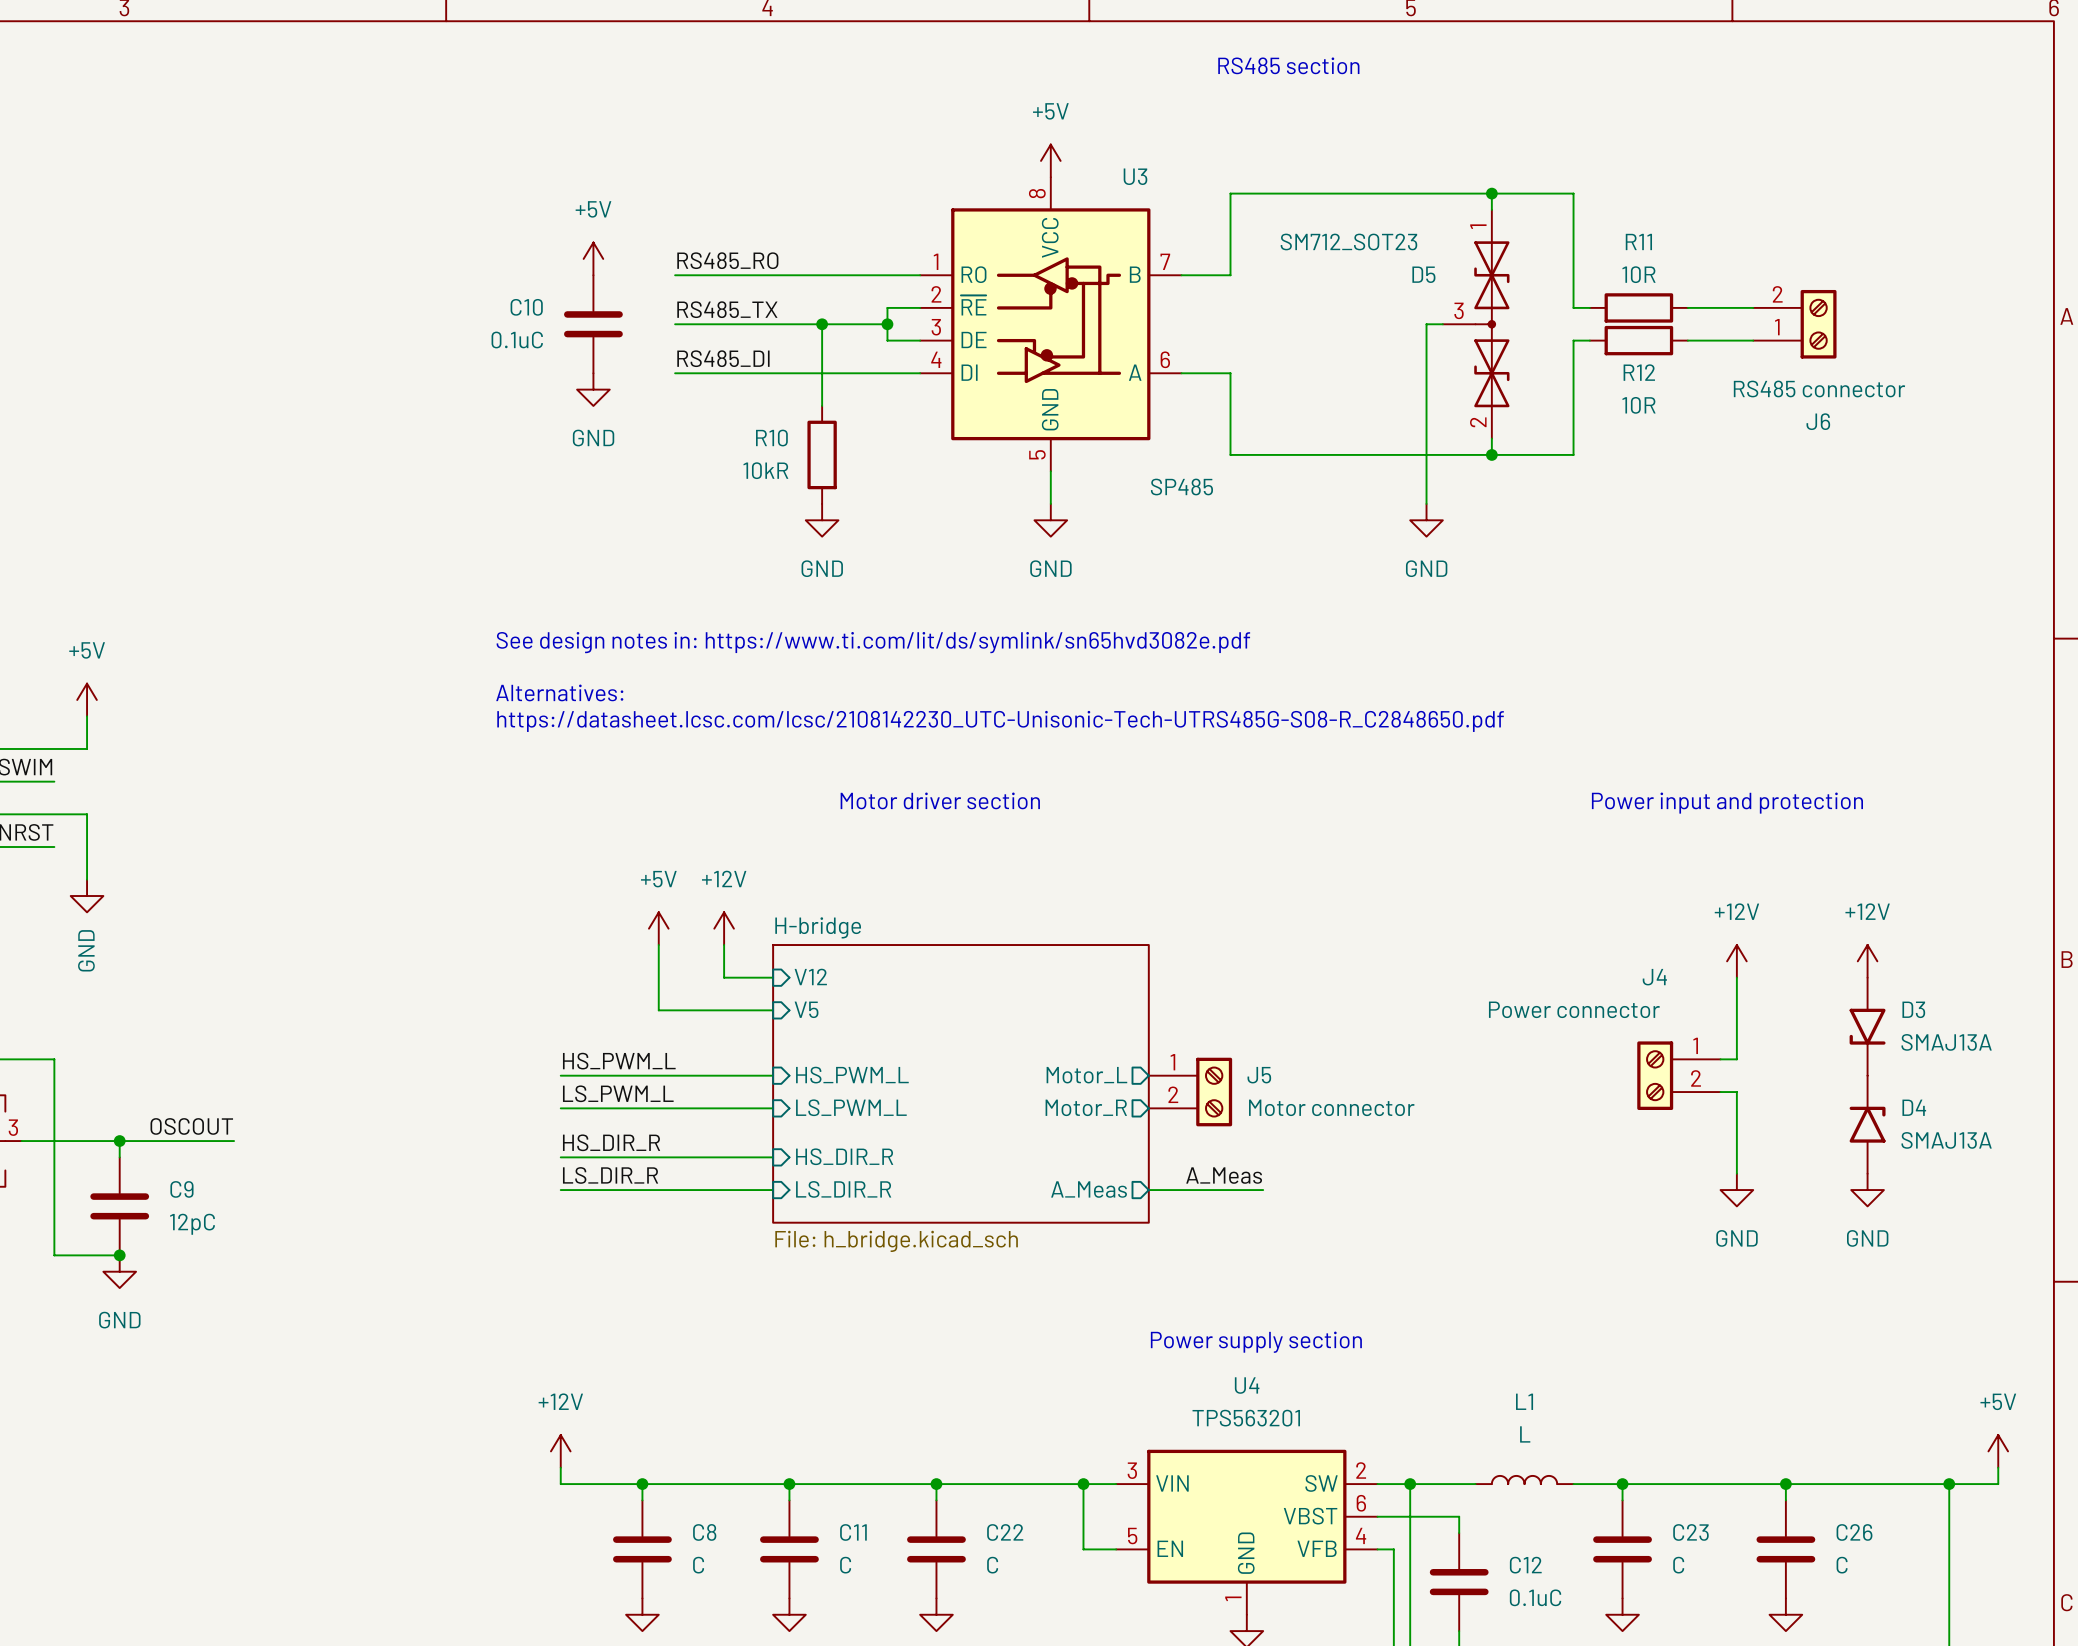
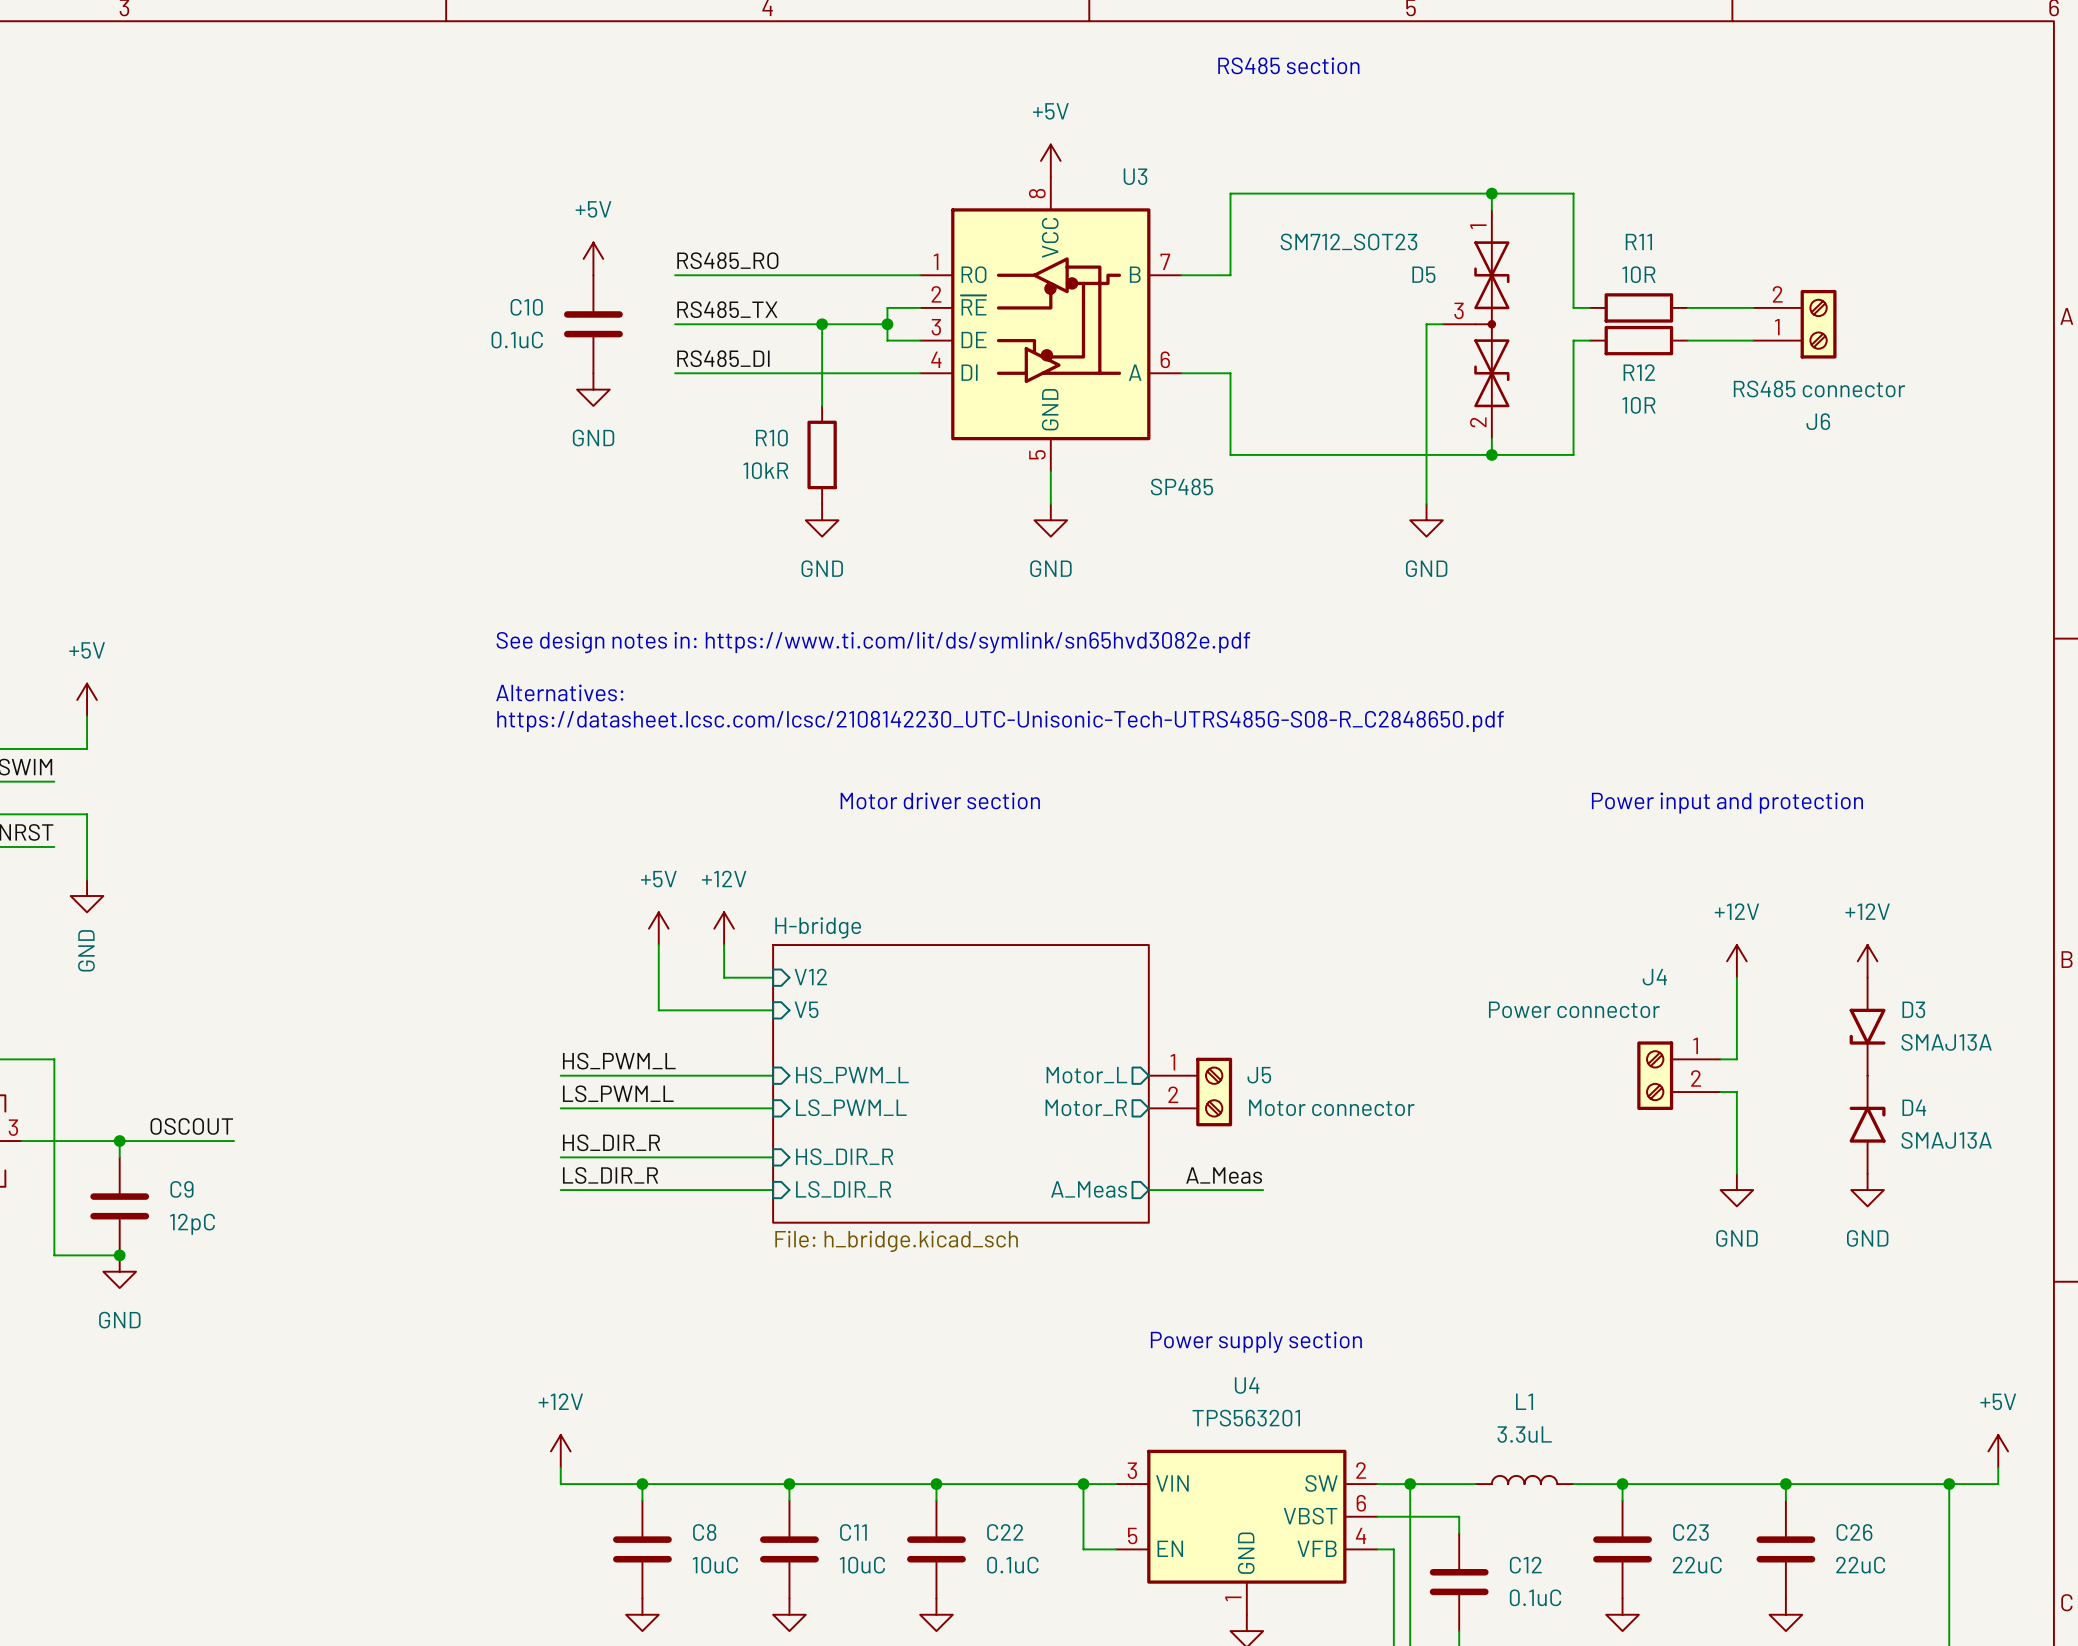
L1 value: L (1525, 1434) -> 3.3uL (1524, 1434)
C8 value: C (698, 1565) -> 10uC (715, 1565)
C11 value: C (845, 1565) -> 10uC (862, 1565)
C22 value: C (992, 1565) -> 0.1uC (1012, 1565)
C23 value: C (1678, 1565) -> 22uC (1697, 1565)
C26 value: C (1842, 1565) -> 22uC (1860, 1565)

